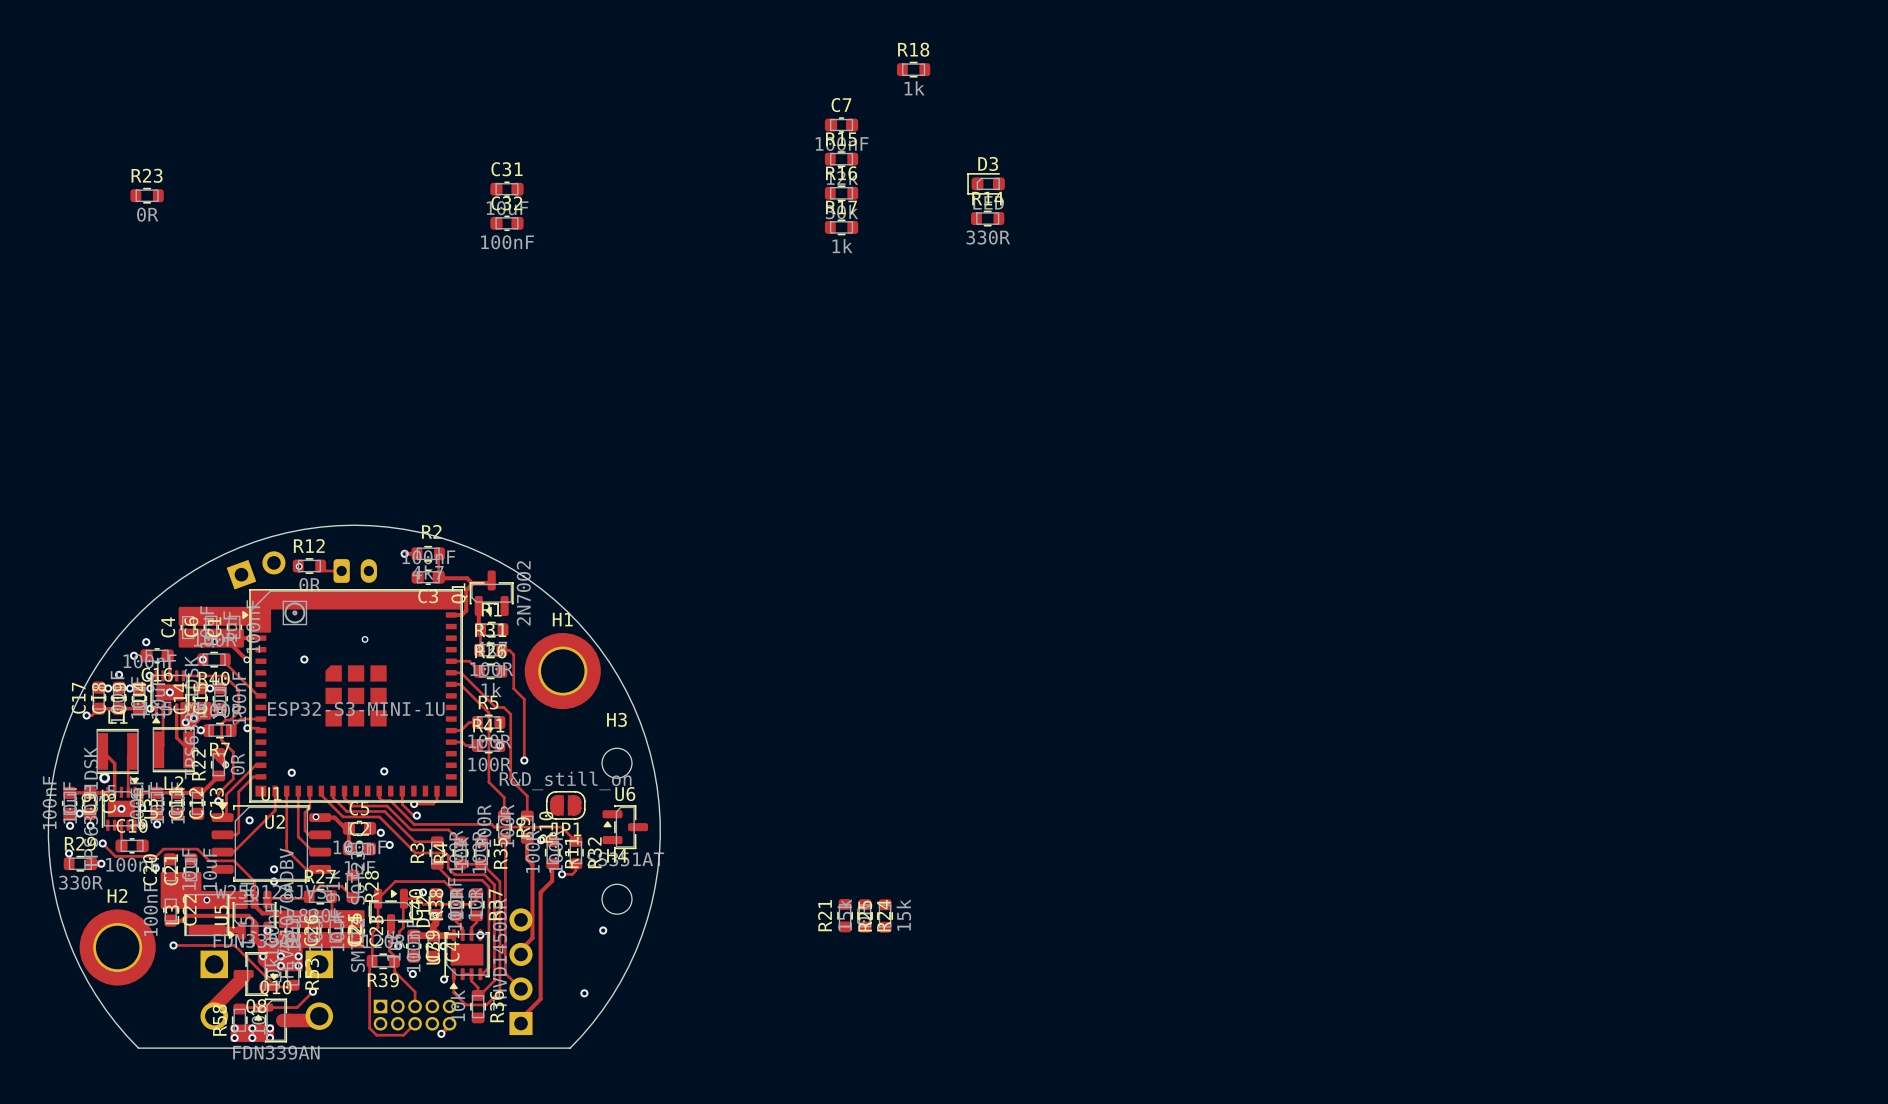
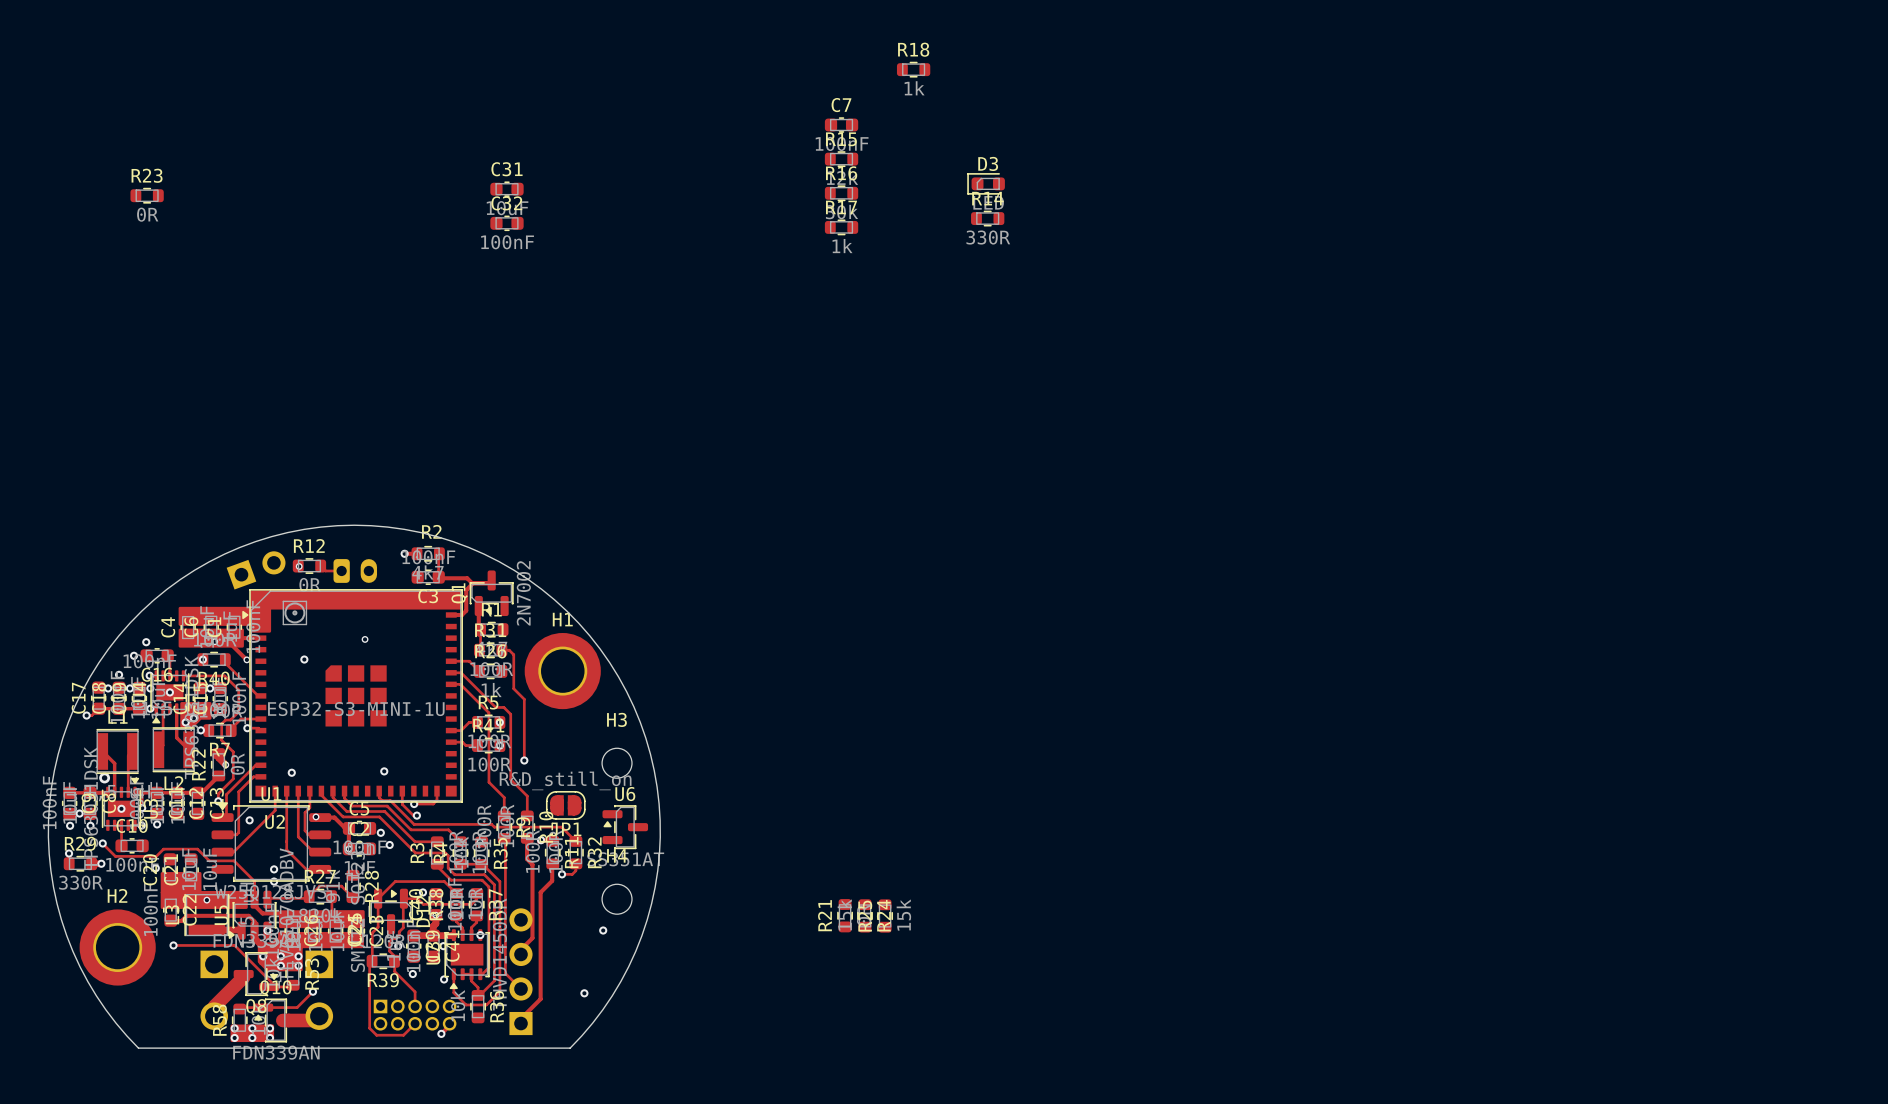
via: none -> (499, 722)

